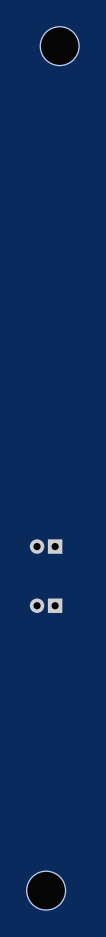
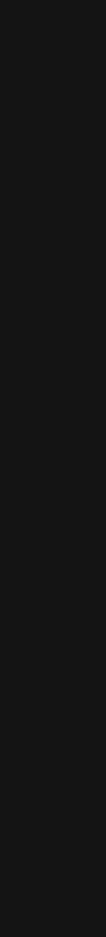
part: (59, 46) -> none
part: (46, 546) -> none
part: (46, 605) -> none
part: (46, 890) -> none

